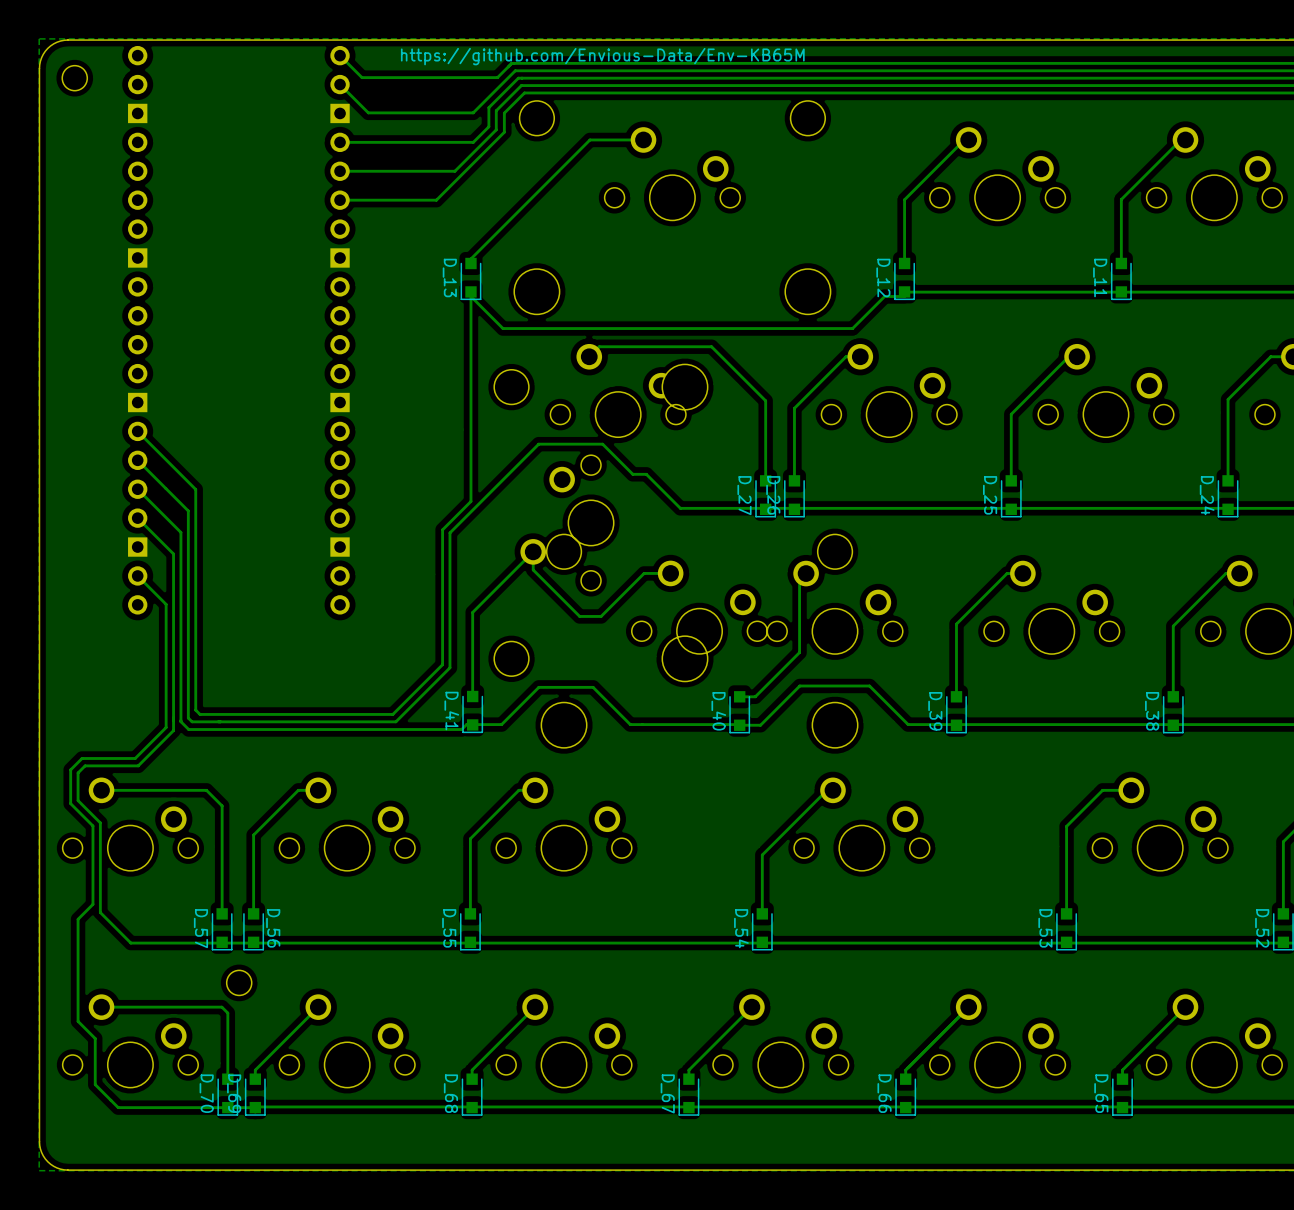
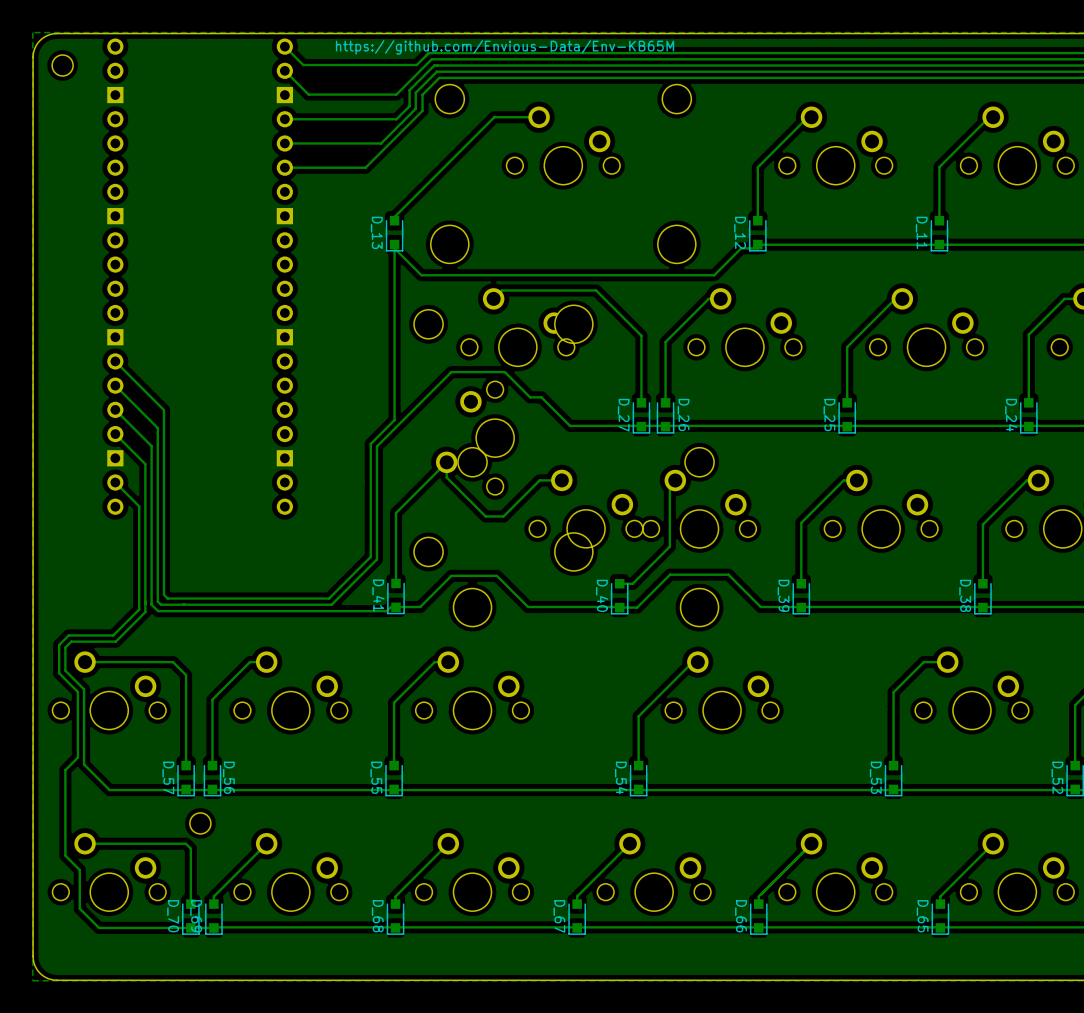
D_26 name position: D_26 (773, 495) -> D_26 (683, 414)

